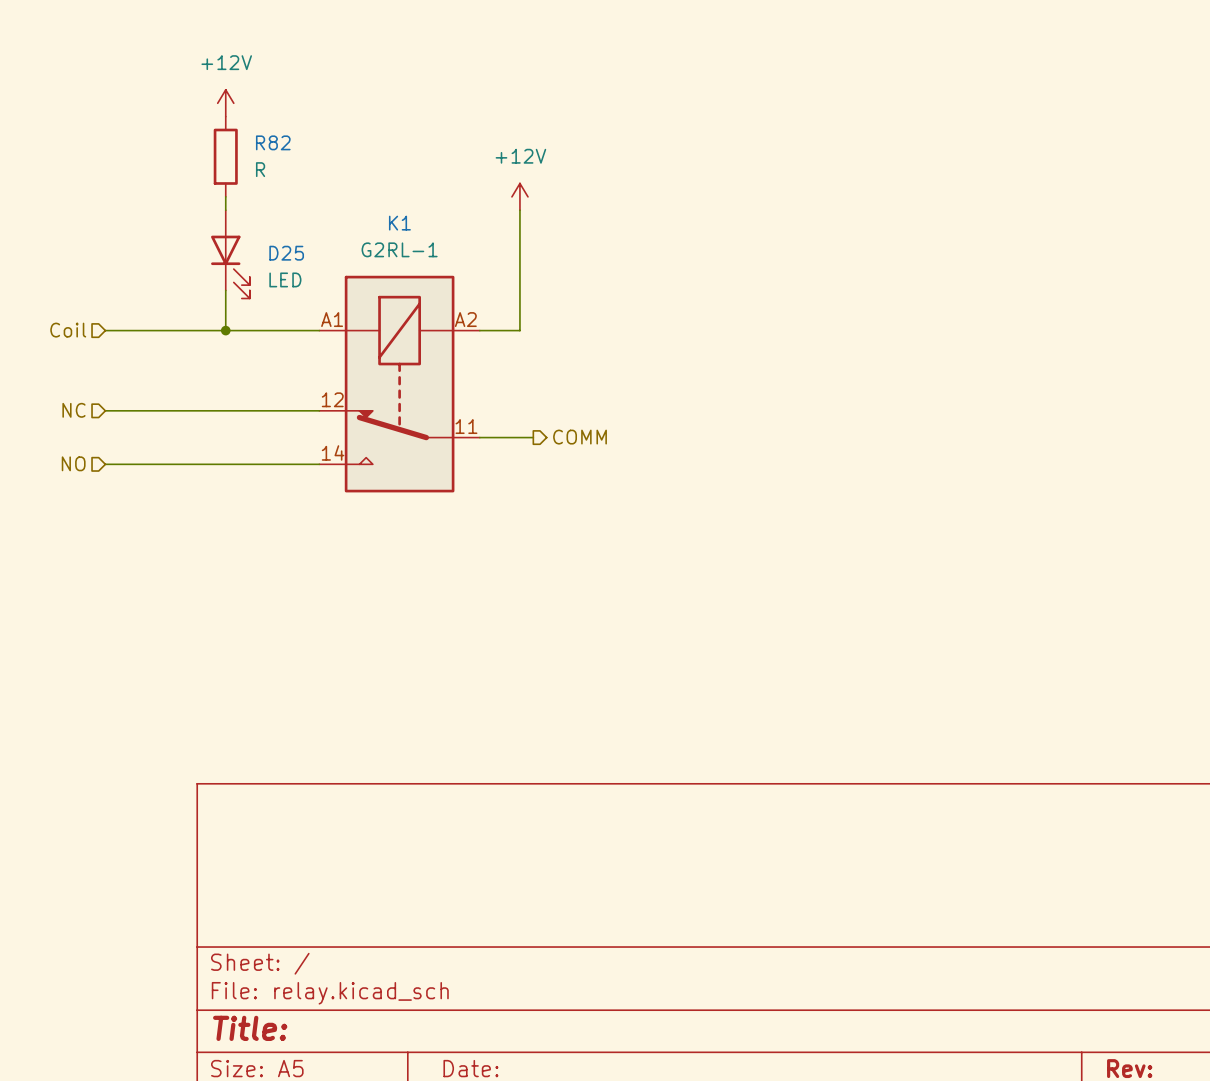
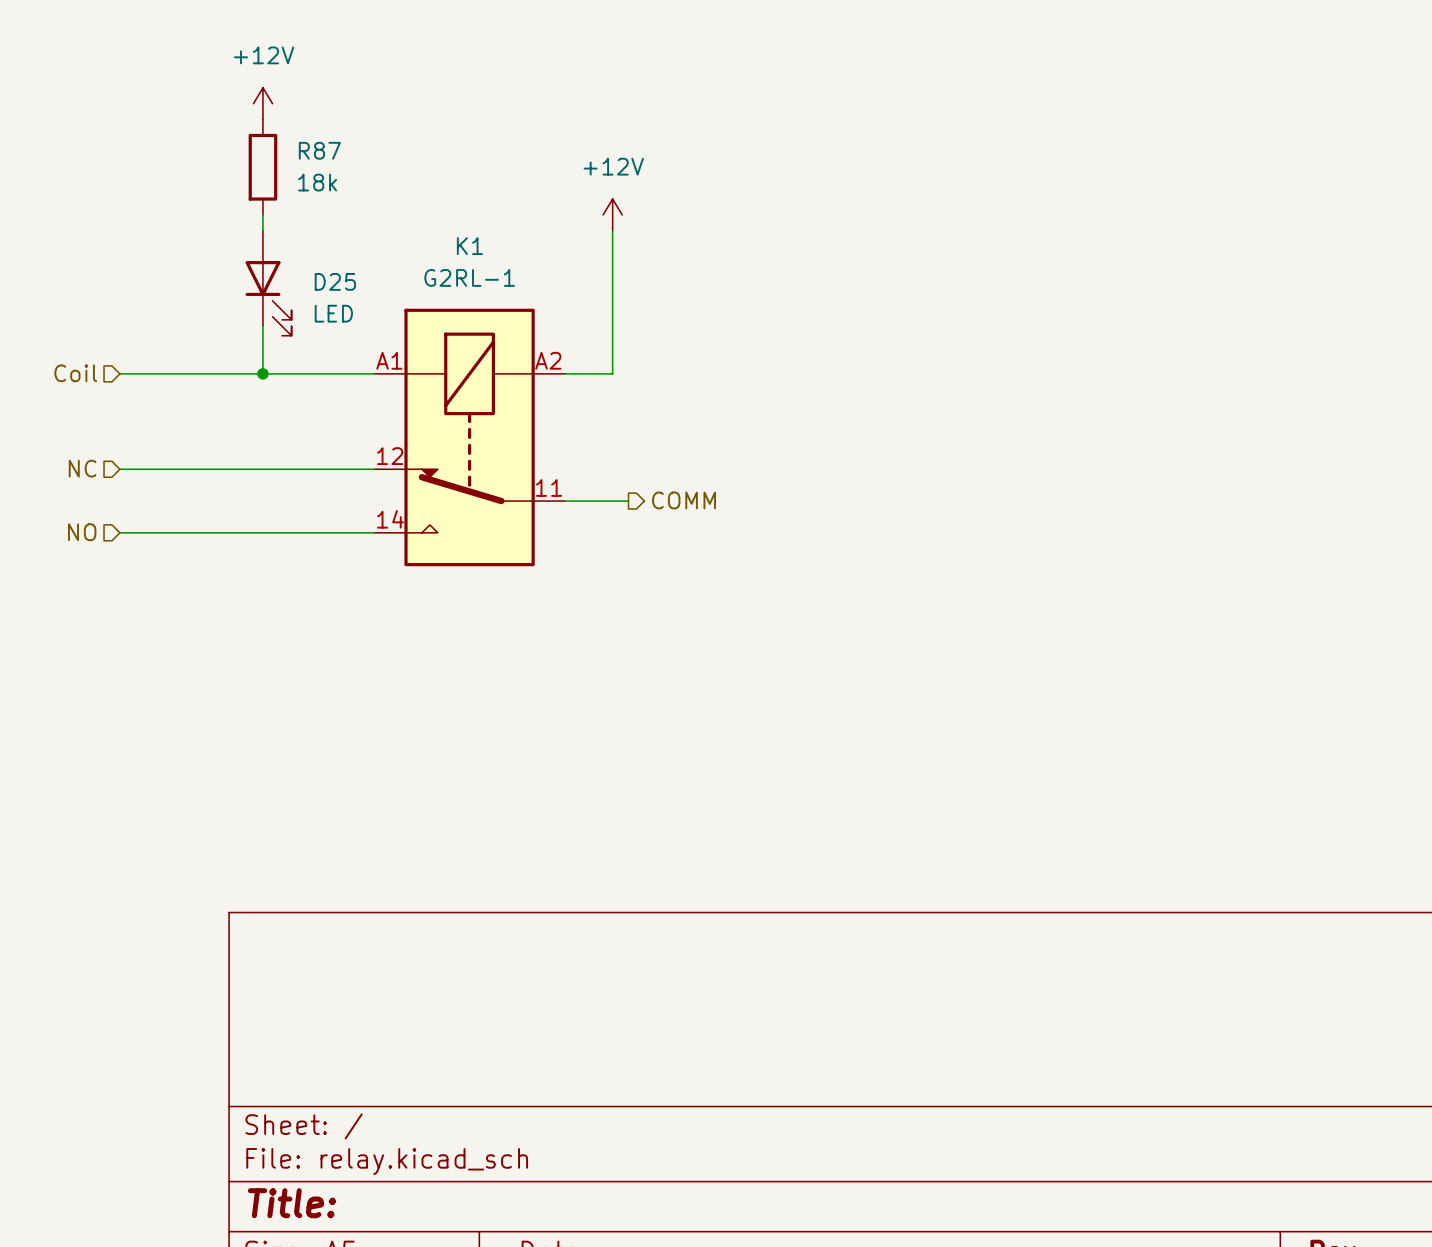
R82 name: R82 (273, 142) -> R87 (319, 150)
R82 value: R (260, 169) -> 18k (317, 182)

